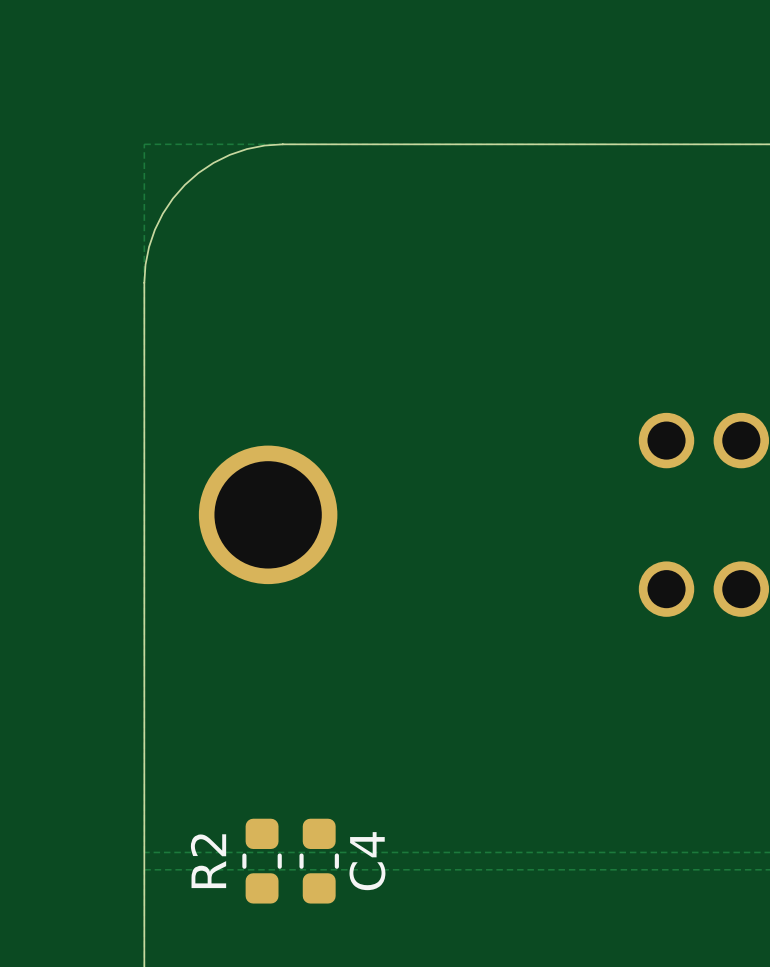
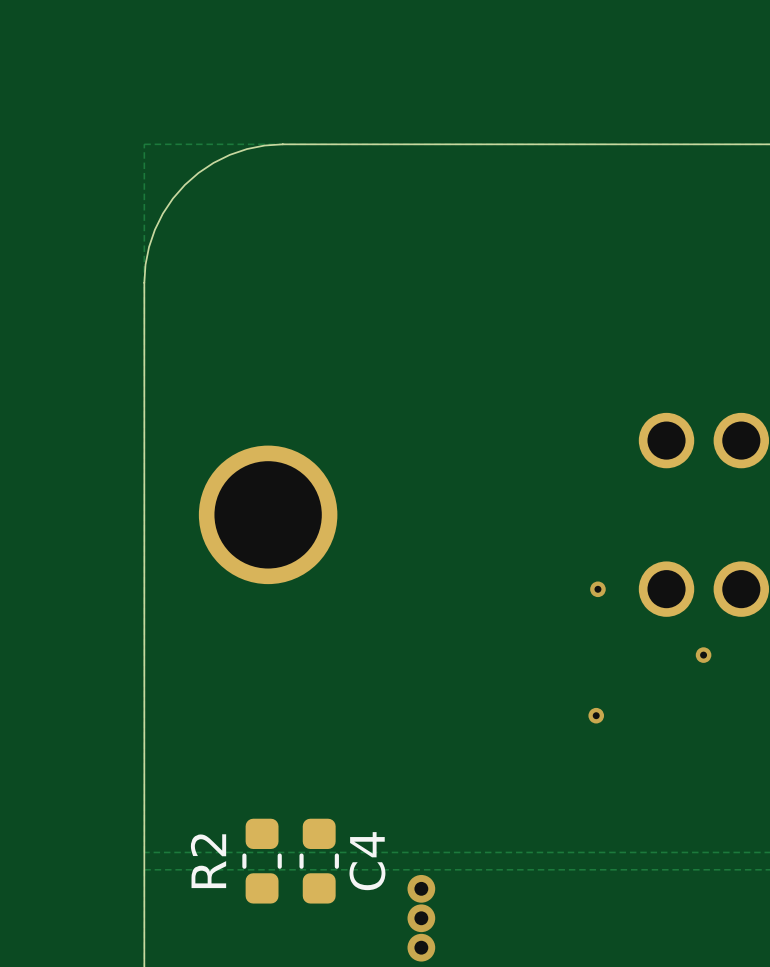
via: none -> (597, 589)
via: none -> (703, 655)
via: none -> (596, 715)
via: none -> (421, 888)
via: none -> (421, 918)
via: none -> (421, 947)

